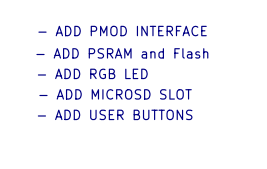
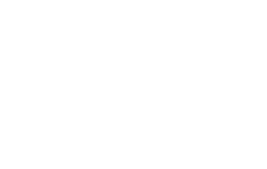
text: - ADD PMOD INTERFACE (122, 31) -> none
text: - ADD PSRAM and Flash (122, 53) -> none
text: - ADD RGB LED (92, 73) -> none
text: - ADD MICROSD SLOT (115, 94) -> none
text: - ADD USER BUTTONS (115, 114) -> none

